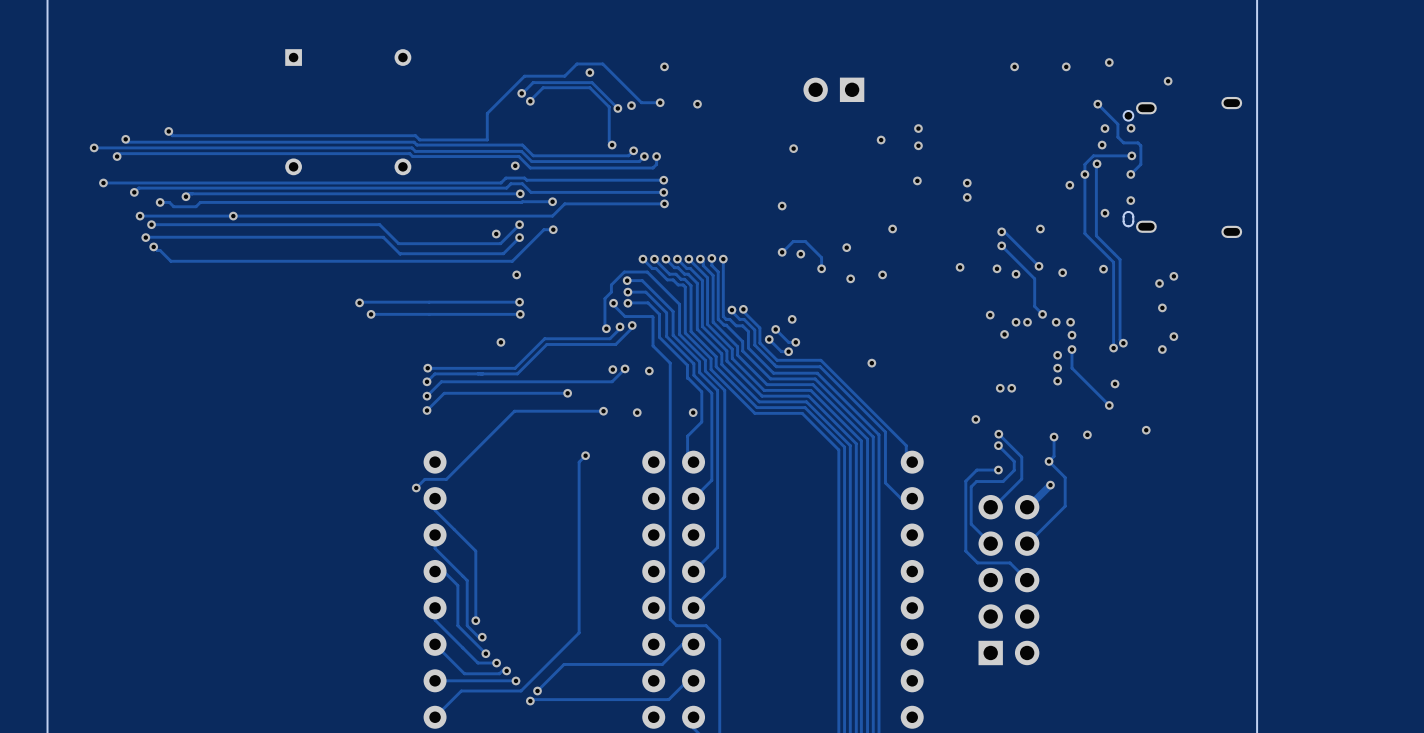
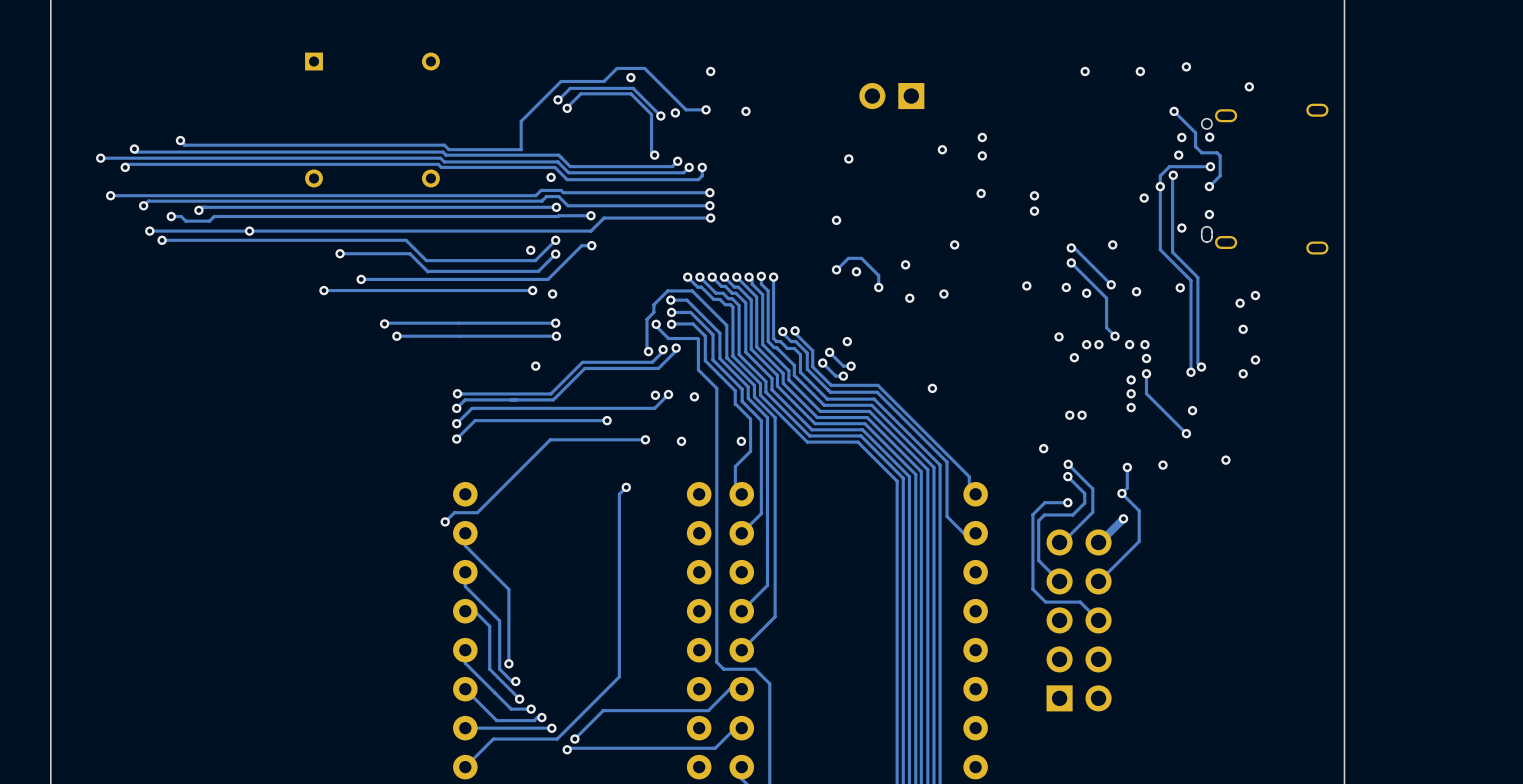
via: (145, 237) -> none
track: (317, 237) (142, 237) -> none
via: none -> (340, 253)
track: (153, 246) (170, 261) (337, 261) -> none
via: (153, 246) -> none
via: none -> (361, 279)
via: none -> (323, 290)
track: none -> (532, 290) (323, 290)
via: none -> (532, 290)

